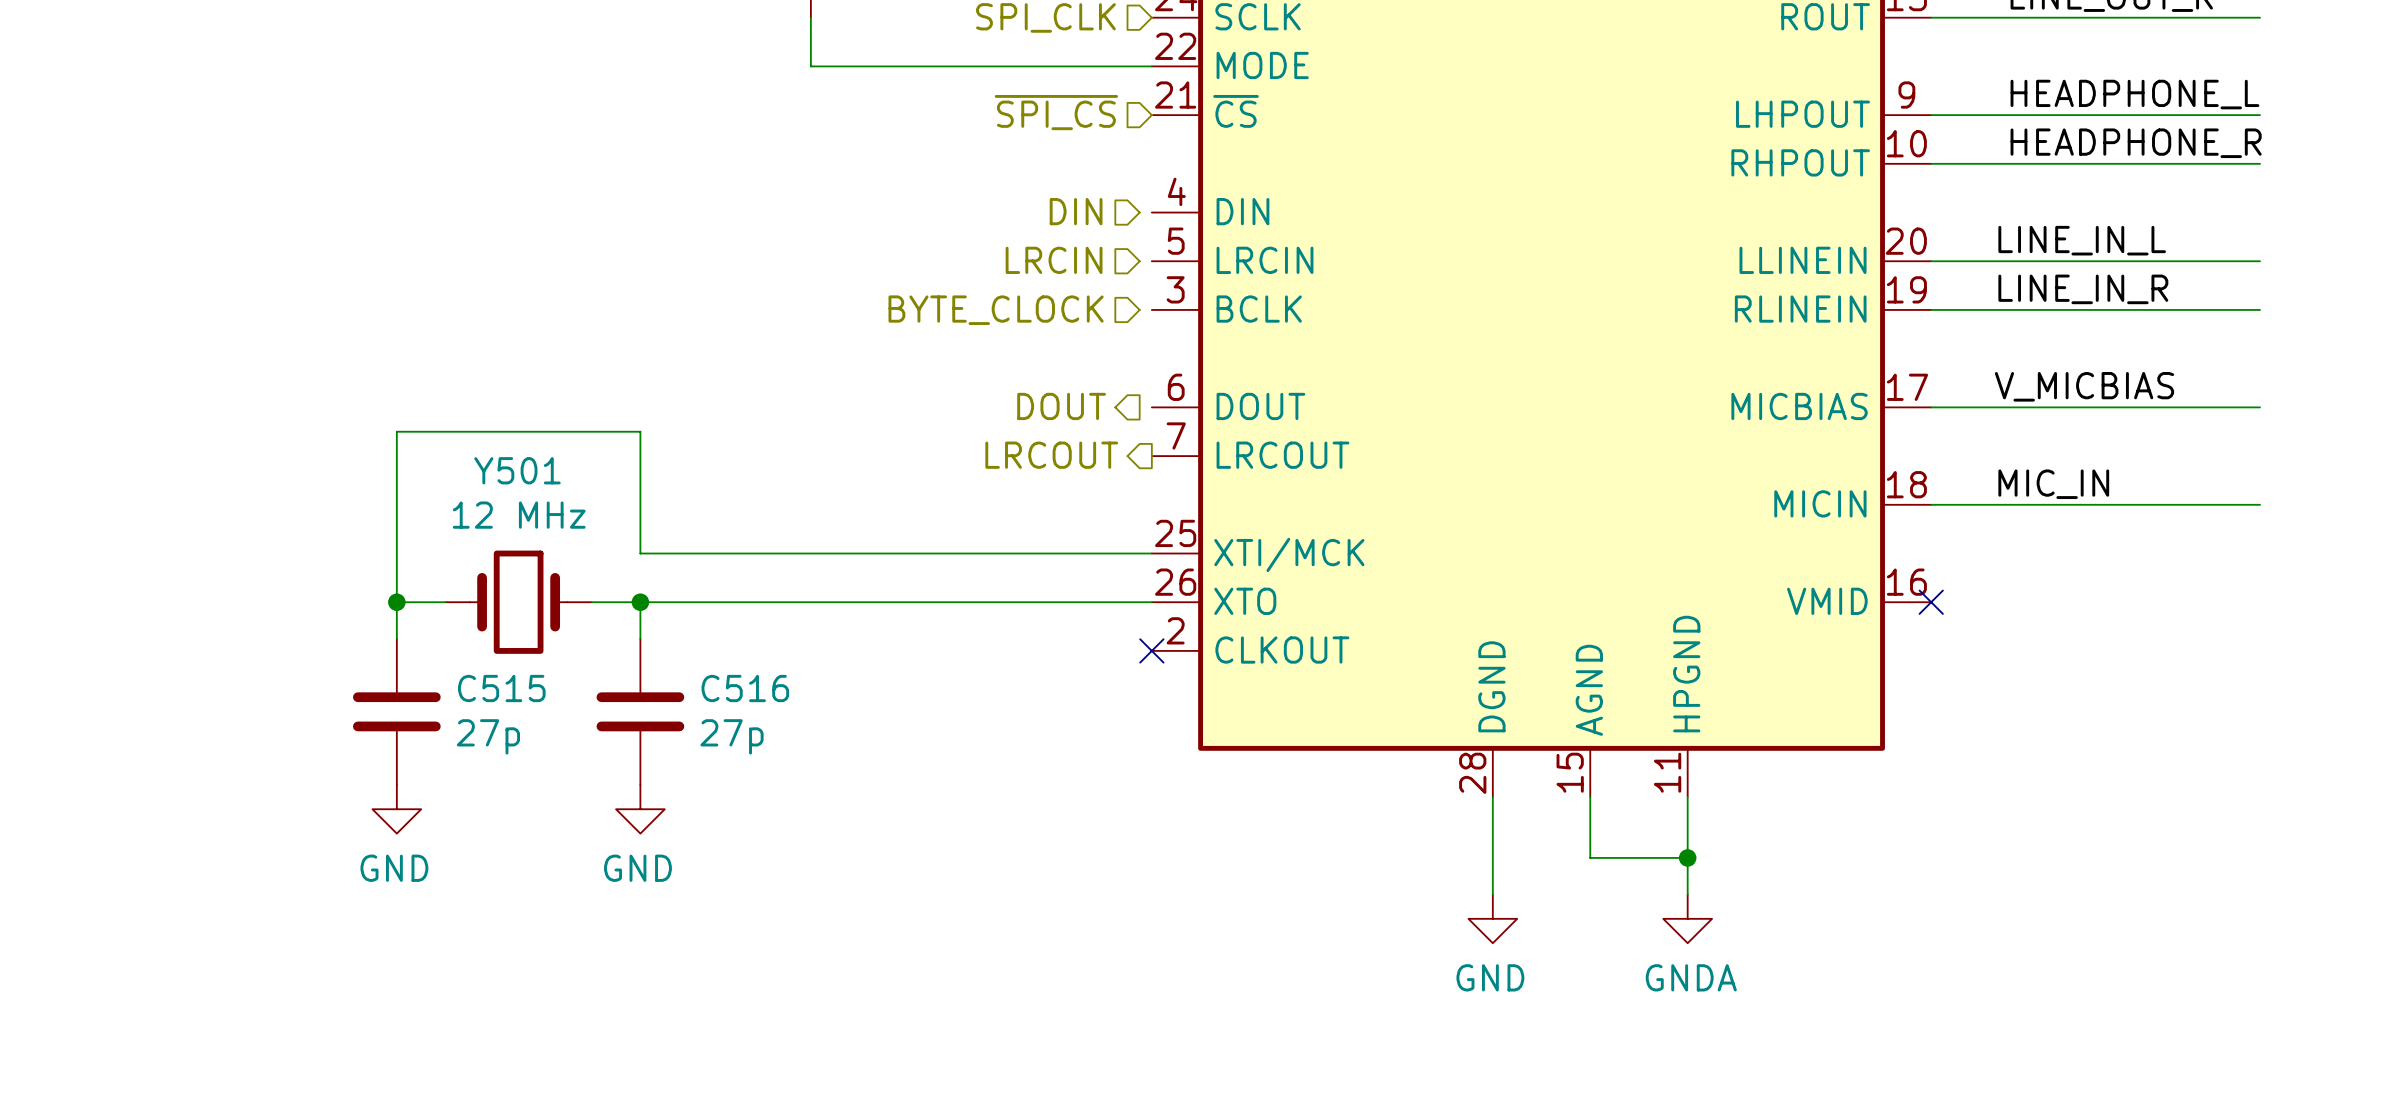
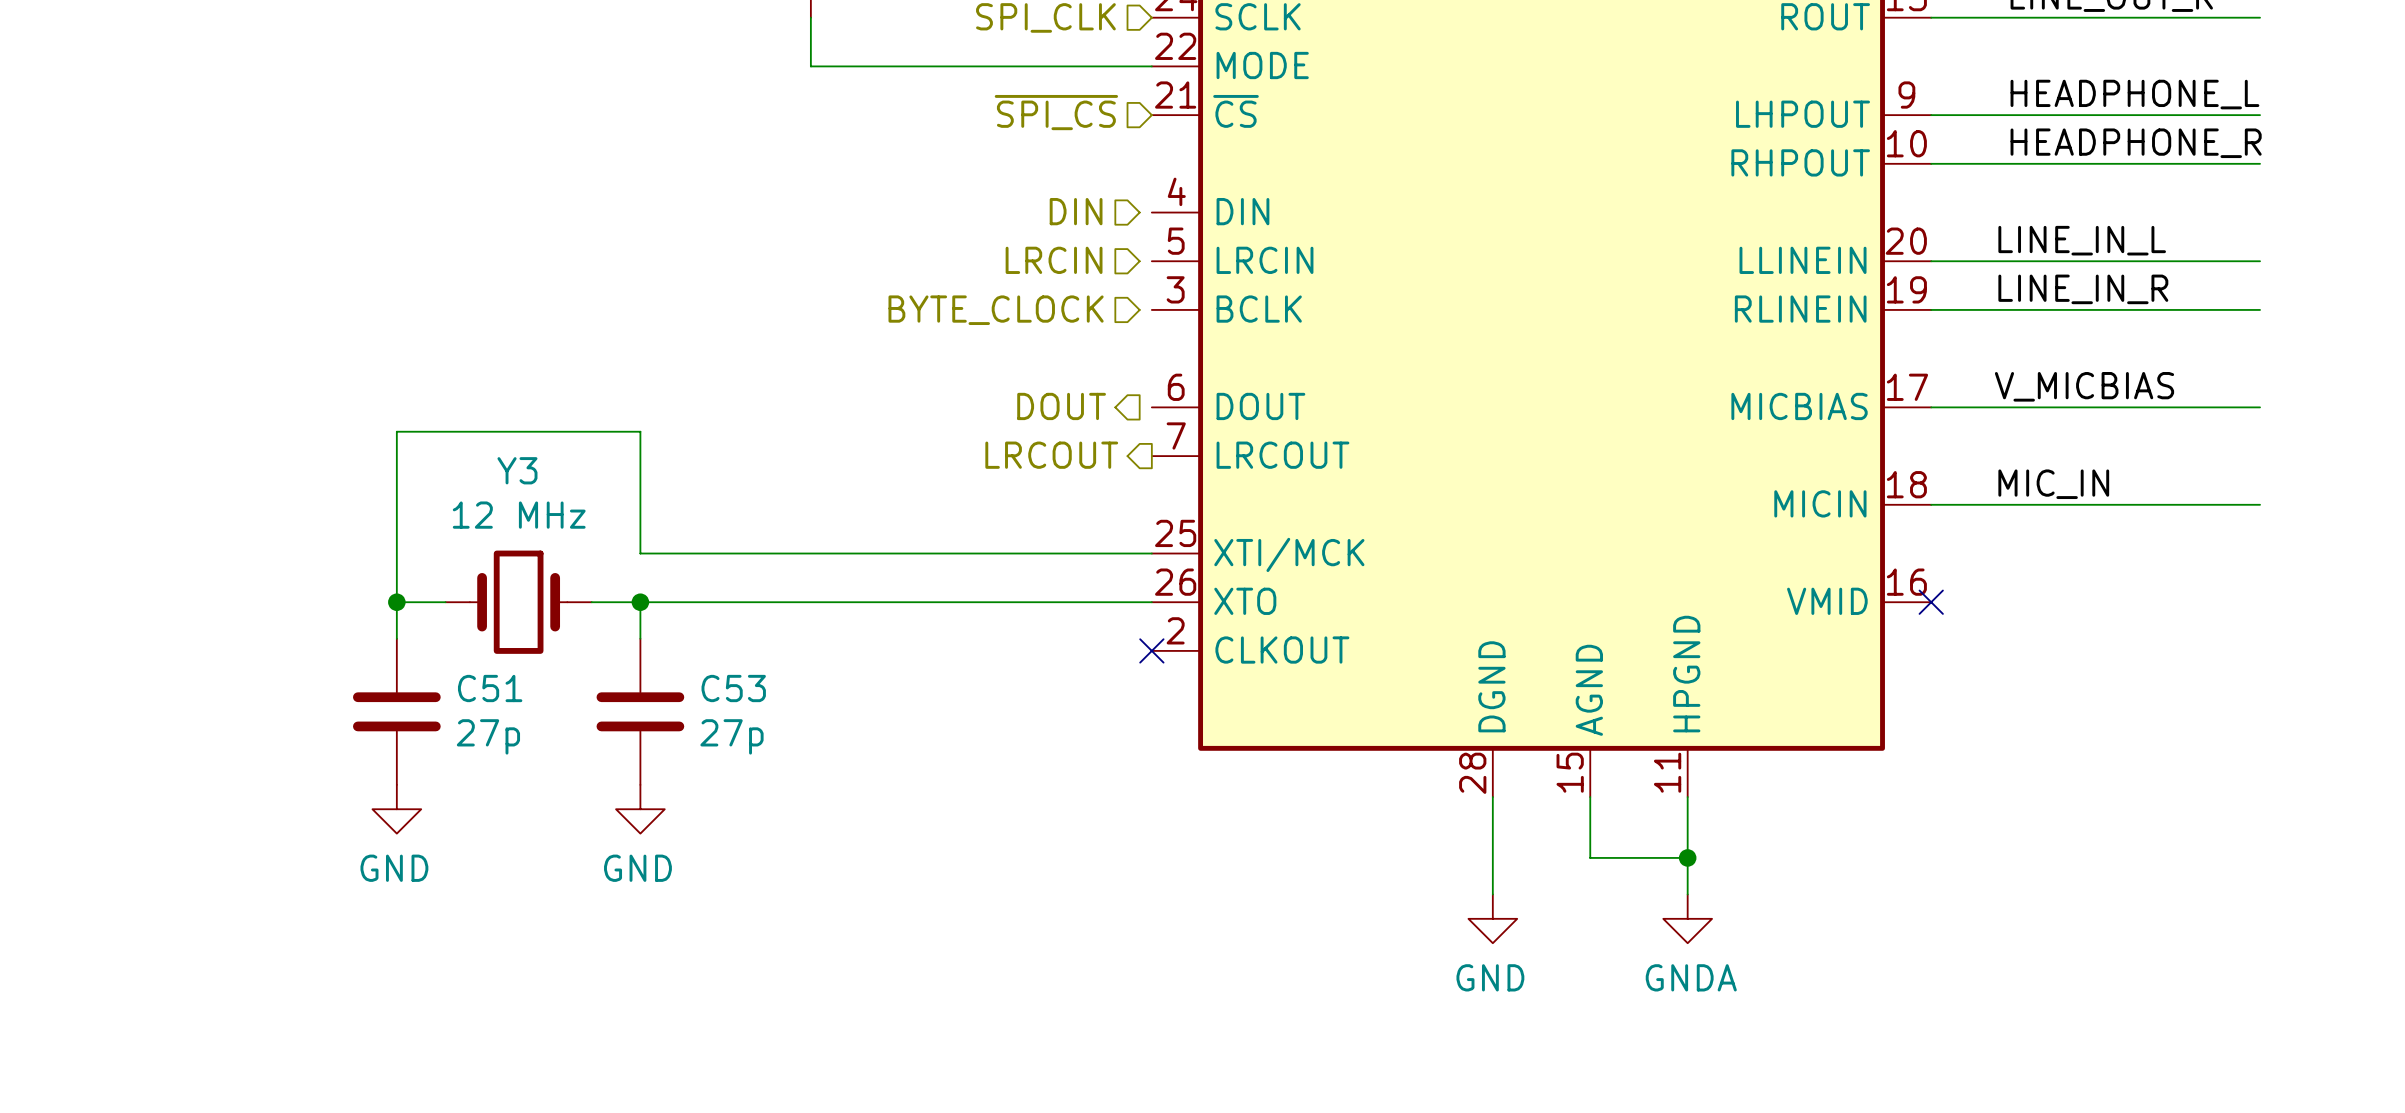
Y501 name: Y501 (517, 470) -> Y3 (517, 470)
C515 name: C515 (501, 688) -> C51 (490, 688)
C516 name: C516 (745, 688) -> C53 (733, 688)

